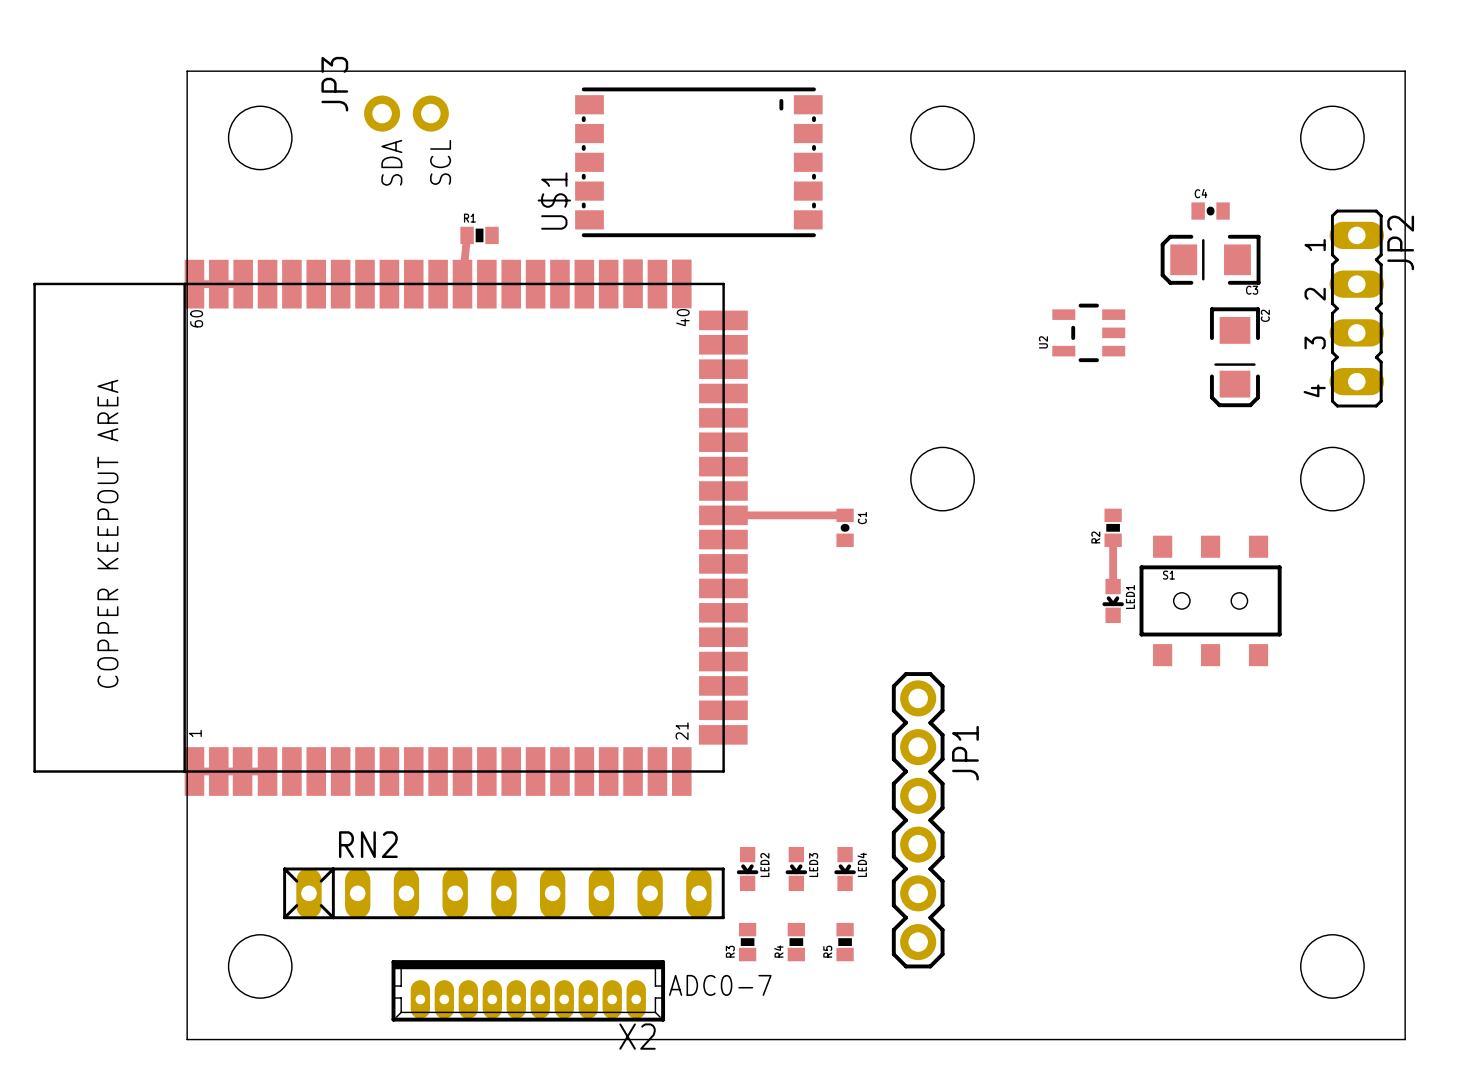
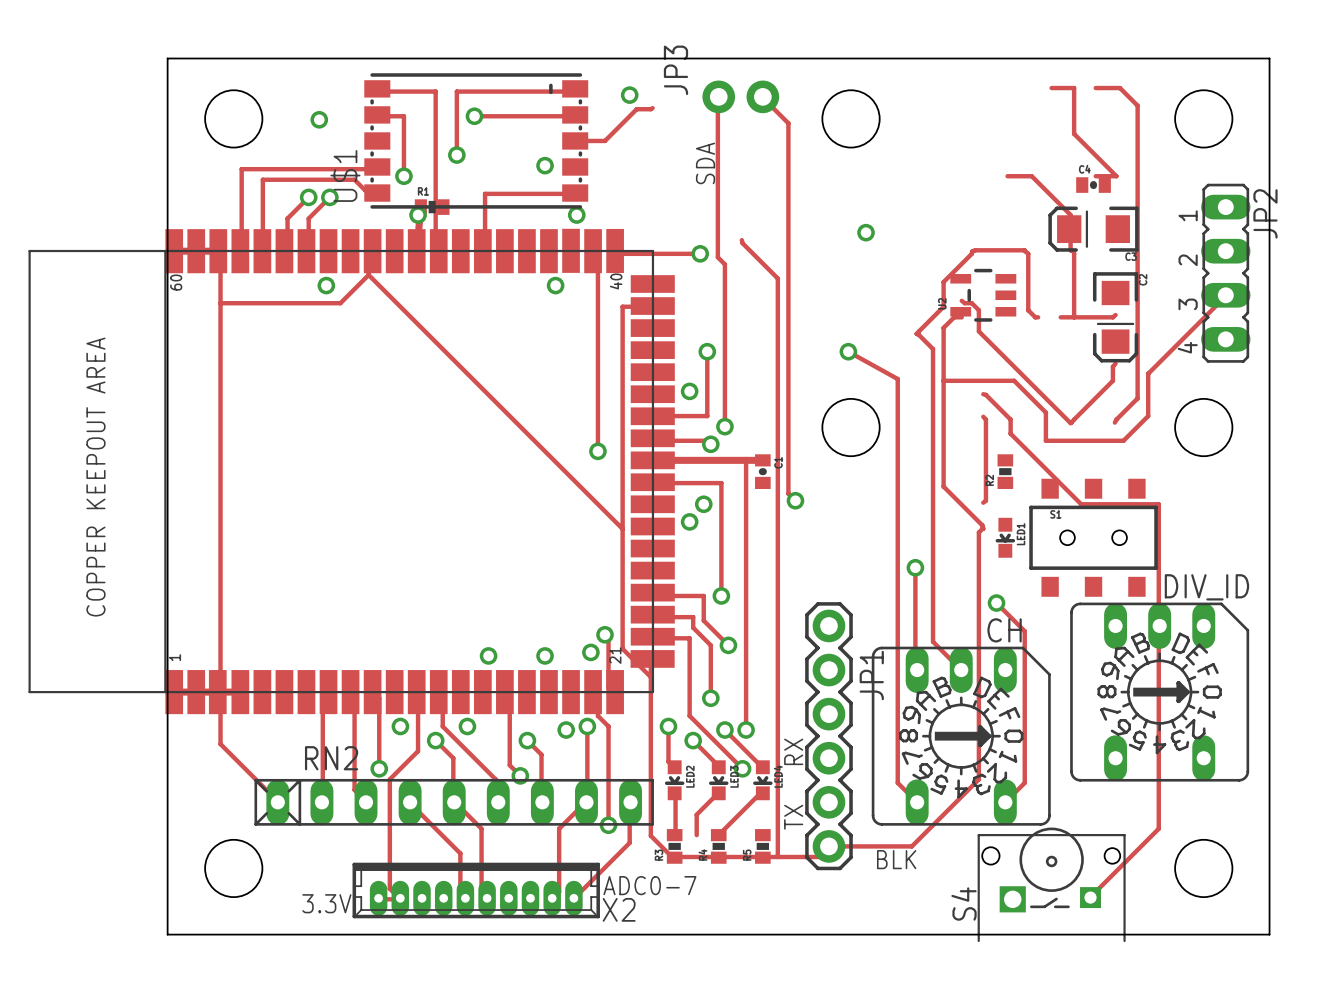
track: none -> (1051, 88) (1074, 88) (1074, 133) (1116, 176) (1095, 176)
track: none -> (1095, 88) (1119, 88) (1137, 105) (1137, 398) (1114, 422)
track: none -> (377, 88) (379, 91) (435, 91) (435, 250) (438, 251)
track: none -> (575, 88) (573, 91) (456, 91) (456, 155)
via: none -> (629, 95)
JP3 position: (406, 113) -> (740, 96)
track: none -> (718, 96) (717, 257) (724, 264) (724, 426)
track: none -> (762, 96) (788, 123) (788, 493) (795, 500)
track: none -> (652, 108) (636, 109) (604, 140) (575, 140)
track: none -> (377, 114) (403, 116) (403, 176)
track: none -> (575, 114) (474, 116)
via: none -> (474, 116)
via: none -> (319, 119)
text position: SDA (391, 162) -> SDA (705, 163)
text: SCL (440, 162) -> none
U$1 position: (698, 162) -> (476, 140)
via: none -> (456, 155)
via: none -> (545, 165)
track: none -> (377, 166) (375, 169) (241, 169) (240, 251)
via: none -> (403, 176)
track: none -> (1007, 176) (1031, 176) (1070, 215) (1070, 250) (1073, 251) (1074, 253) (1074, 317)
track: none -> (377, 193) (375, 190) (365, 190) (354, 179) (262, 179) (262, 251)
track: none -> (575, 193) (485, 193) (485, 250) (482, 251)
track: none -> (308, 197) (287, 218) (287, 250) (284, 251)
via: none -> (308, 197)
track: none -> (329, 197) (308, 218) (308, 250) (306, 251)
via: none -> (329, 197)
via: none -> (418, 215)
via: none -> (576, 215)
via: none -> (866, 232)
track: none -> (741, 240) (742, 243) (777, 278) (777, 856)
track: none -> (615, 251) (615, 253) (700, 253)
track: none -> (196, 251) (216, 250) (220, 253) (220, 691) (217, 692) (220, 694) (220, 744) (277, 802)
track: none -> (593, 251) (597, 257) (597, 451)
via: none -> (700, 253)
track: none -> (368, 274) (340, 303) (220, 303)
track: none -> (368, 274) (622, 528)
via: none -> (326, 285)
via: none -> (555, 285)
track: none -> (1225, 295) (1148, 373) (1148, 416) (1123, 440) (1045, 440) (1045, 412) (1014, 380) (943, 380)
track: none -> (961, 300) (964, 303) (971, 303) (978, 310) (978, 331) (1070, 423) (1112, 380) (1112, 366) (1115, 363)
track: none -> (652, 306) (622, 306) (622, 648) (650, 677)
track: none -> (1115, 315) (1112, 317) (1060, 317)
track: none -> (961, 317) (954, 317) (943, 327) (943, 486) (982, 525) (983, 528) (978, 532) (978, 779) (911, 846) (827, 846) (827, 856) (672, 856) (650, 835) (650, 659) (652, 658)
track: none -> (1038, 317) (1035, 317) (1028, 310) (1028, 253) (1024, 250) (975, 250) (943, 282) (943, 306) (916, 333) (933, 349) (933, 641) (961, 670)
track: none -> (707, 351) (707, 416) (652, 416)
via: none -> (707, 351)
track: none -> (848, 351) (897, 379) (897, 782) (917, 802)
via: none -> (848, 351)
via: none -> (689, 391)
track: none -> (983, 394) (1010, 419) (1010, 433) (1081, 504) (1158, 504) (1158, 828) (1090, 897)
track: none -> (983, 416) (985, 419) (985, 500) (983, 502)
via: none -> (724, 426)
track: none -> (652, 438) (654, 440) (710, 440) (710, 444)
via: none -> (710, 444)
via: none -> (597, 451)
track: none -> (746, 460) (746, 730)
track: none -> (652, 482) (721, 483) (721, 595)
track: (1113, 540) (1113, 586) -> none
via: none -> (795, 500)
via: none -> (703, 504)
via: none -> (689, 521)
track: none -> (915, 567) (915, 670) (917, 670)
via: none -> (915, 567)
track: none -> (652, 592) (654, 595) (703, 595) (703, 620) (728, 645)
via: none -> (721, 595)
track: none -> (996, 603) (1024, 631) (1024, 782) (1005, 802)
via: none -> (996, 603)
track: none -> (652, 614) (654, 617) (693, 617) (693, 627) (710, 645) (710, 698)
track: none -> (604, 634) (608, 638) (608, 687) (615, 692)
via: none -> (604, 634)
track: none -> (652, 636) (654, 638) (689, 638) (689, 715) (742, 768)
via: none -> (728, 645)
via: none -> (590, 652)
via: none -> (488, 655)
via: none -> (545, 655)
track: none -> (328, 692) (322, 698) (321, 802)
track: none -> (350, 692) (354, 698) (354, 789) (366, 802)
track: none -> (372, 692) (379, 698) (379, 768)
track: none -> (416, 692) (418, 751) (389, 779) (389, 888) (400, 898) (378, 898)
track: none -> (438, 692) (442, 698) (442, 726) (495, 779) (495, 800) (498, 802)
track: none -> (504, 692) (509, 698) (509, 765) (520, 775)
track: none -> (593, 692) (597, 698) (597, 715) (608, 726) (608, 825)
DIV_ID: none -> (1159, 692)
via: none -> (710, 698)
via: none -> (400, 726)
via: none -> (467, 726)
track: none -> (587, 726) (587, 800) (559, 828) (559, 892) (552, 898)
via: none -> (587, 726)
track: none -> (668, 726) (668, 761) (674, 767)
via: none -> (668, 726)
via: none -> (566, 730)
track: none -> (724, 730) (762, 767)
via: none -> (724, 730)
via: none -> (746, 730)
CH: none -> (961, 736)
track: none -> (435, 740) (453, 758) (454, 802) (481, 828) (481, 892) (487, 898)
via: none -> (435, 740)
track: none -> (527, 740) (541, 754) (542, 802)
via: none -> (527, 740)
track: none -> (693, 740) (718, 767)
via: none -> (693, 740)
text: none -> RX (793, 751)
via: none -> (379, 768)
via: none -> (742, 768)
via: none -> (520, 775)
track: none -> (674, 793) (674, 835)
track: none -> (718, 793) (696, 814) (696, 835)
track: none -> (762, 793) (760, 793) (718, 835)
track: none -> (410, 802) (460, 853) (460, 892) (465, 898)
track: none -> (630, 802) (629, 842) (573, 898)
text: none -> TX (793, 817)
via: none -> (608, 825)
text: none -> BLK (896, 859)
S4: none -> (1051, 884)
text: none -> 3.3V (326, 903)
X2 name position: X2 (637, 1036) -> X2 (619, 909)

